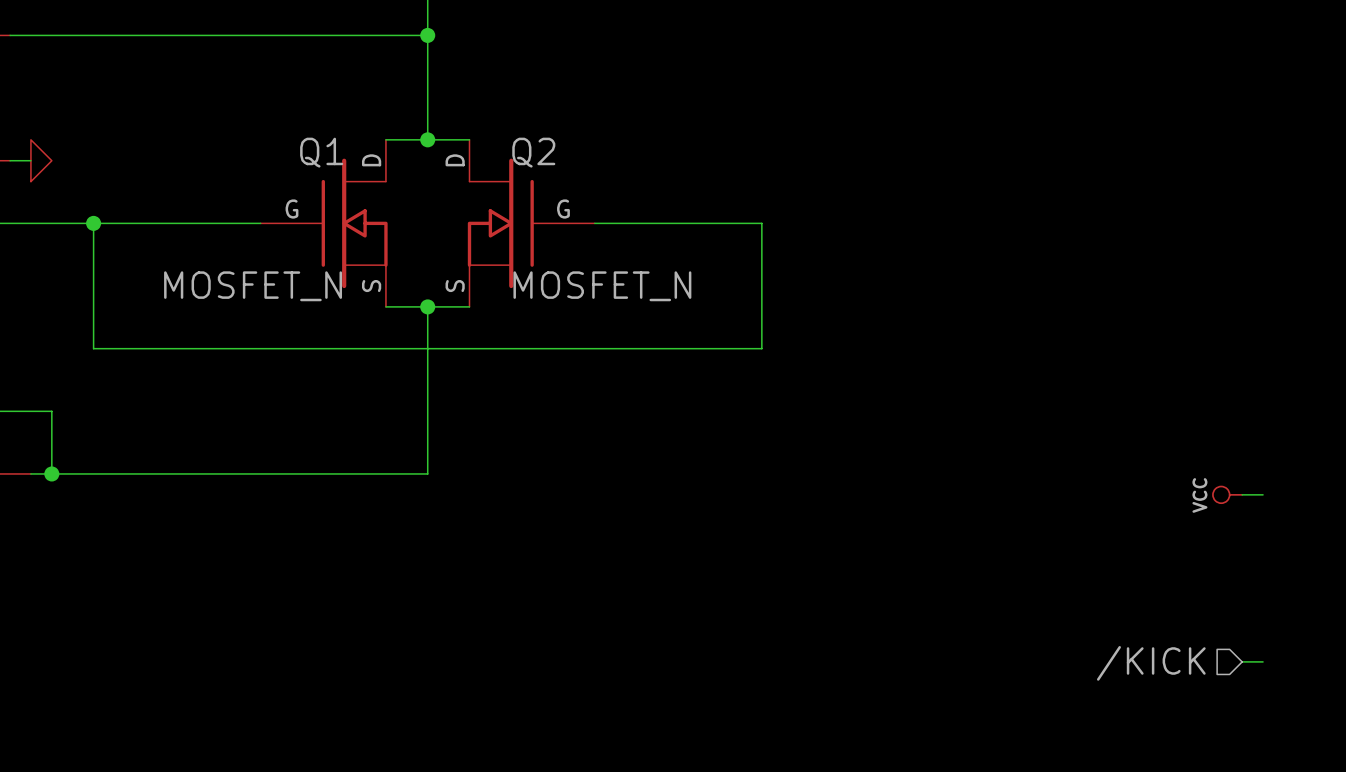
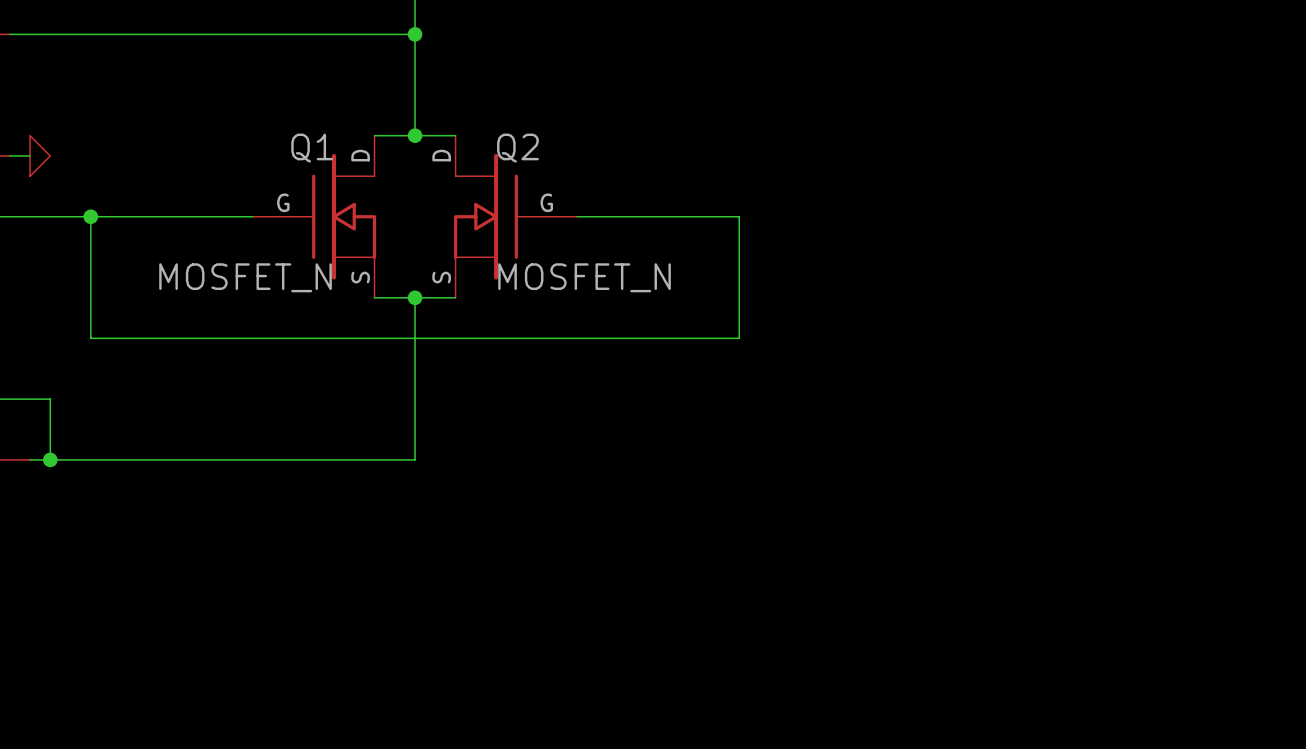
power symbol: VCC (1227, 494) -> none
wire: (1242, 494) (1263, 494) -> none
wire: (1242, 661) (1263, 661) -> none
hierarchical label: /KICK (1151, 663) -> none

